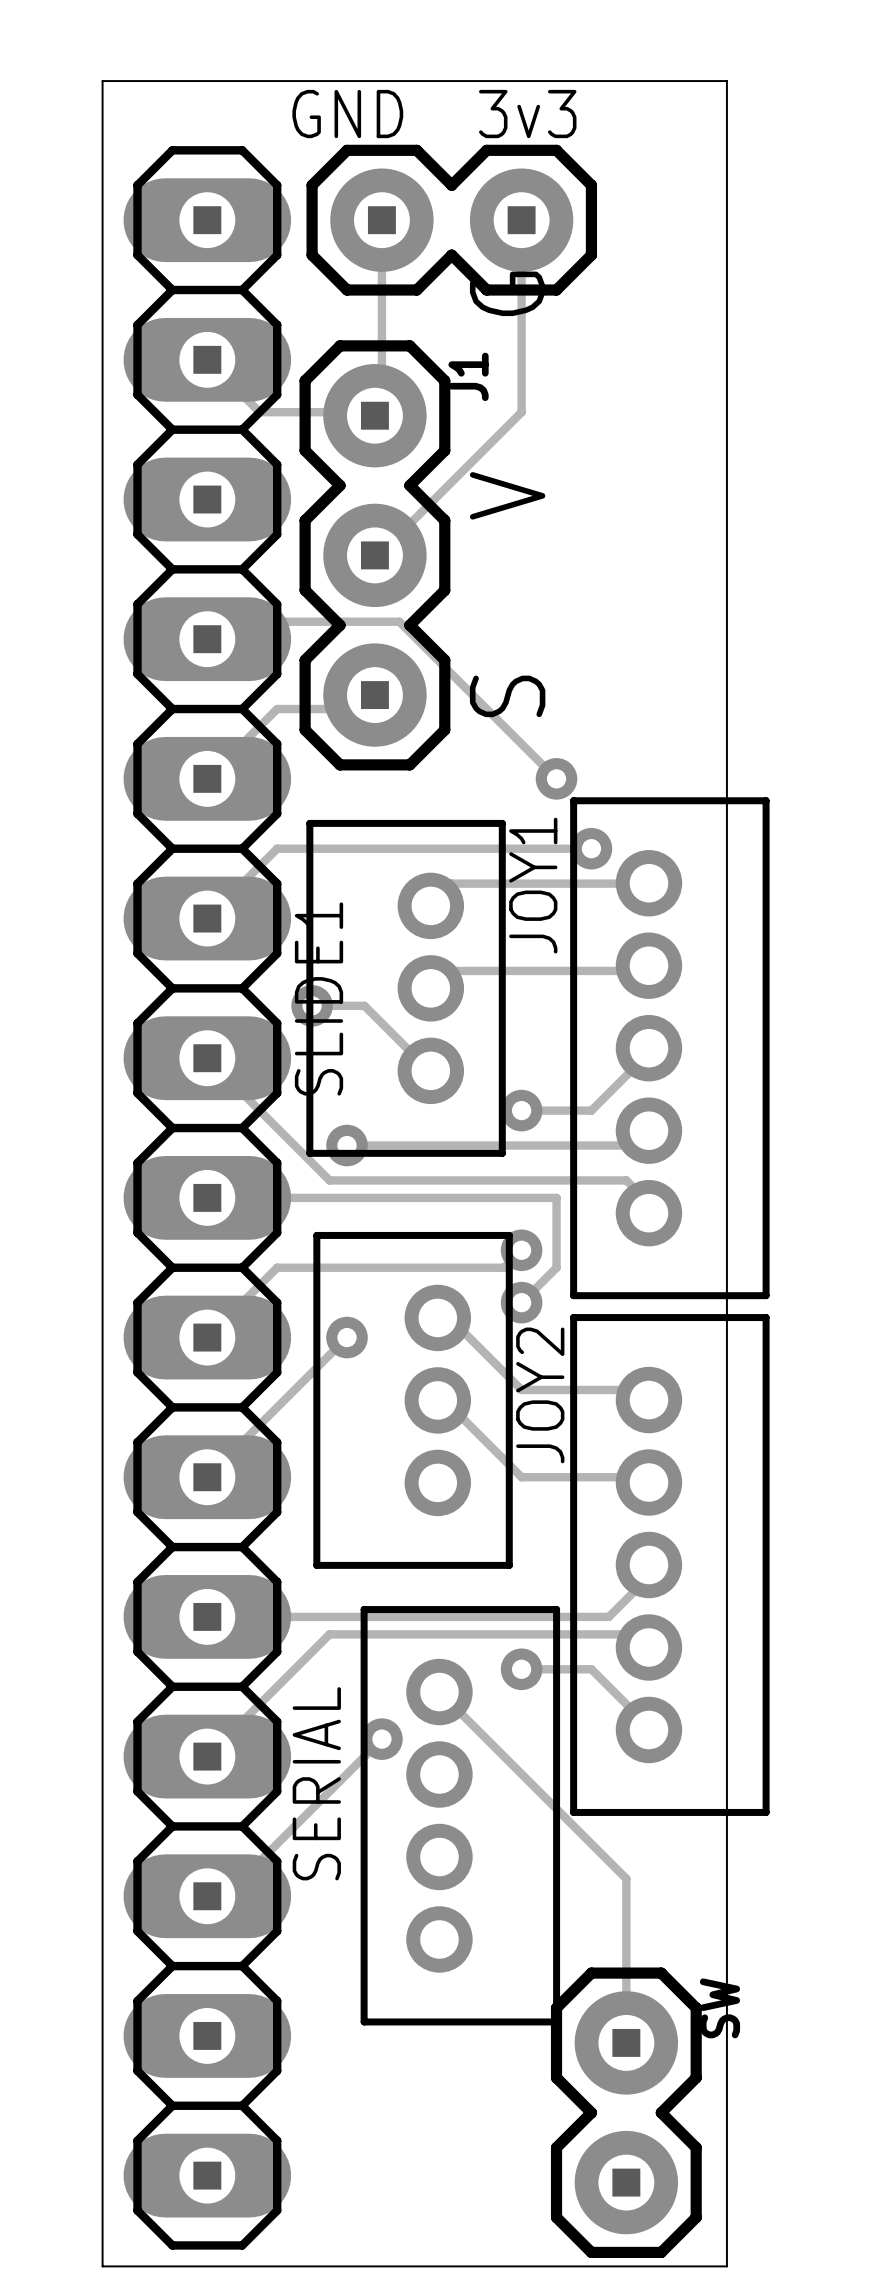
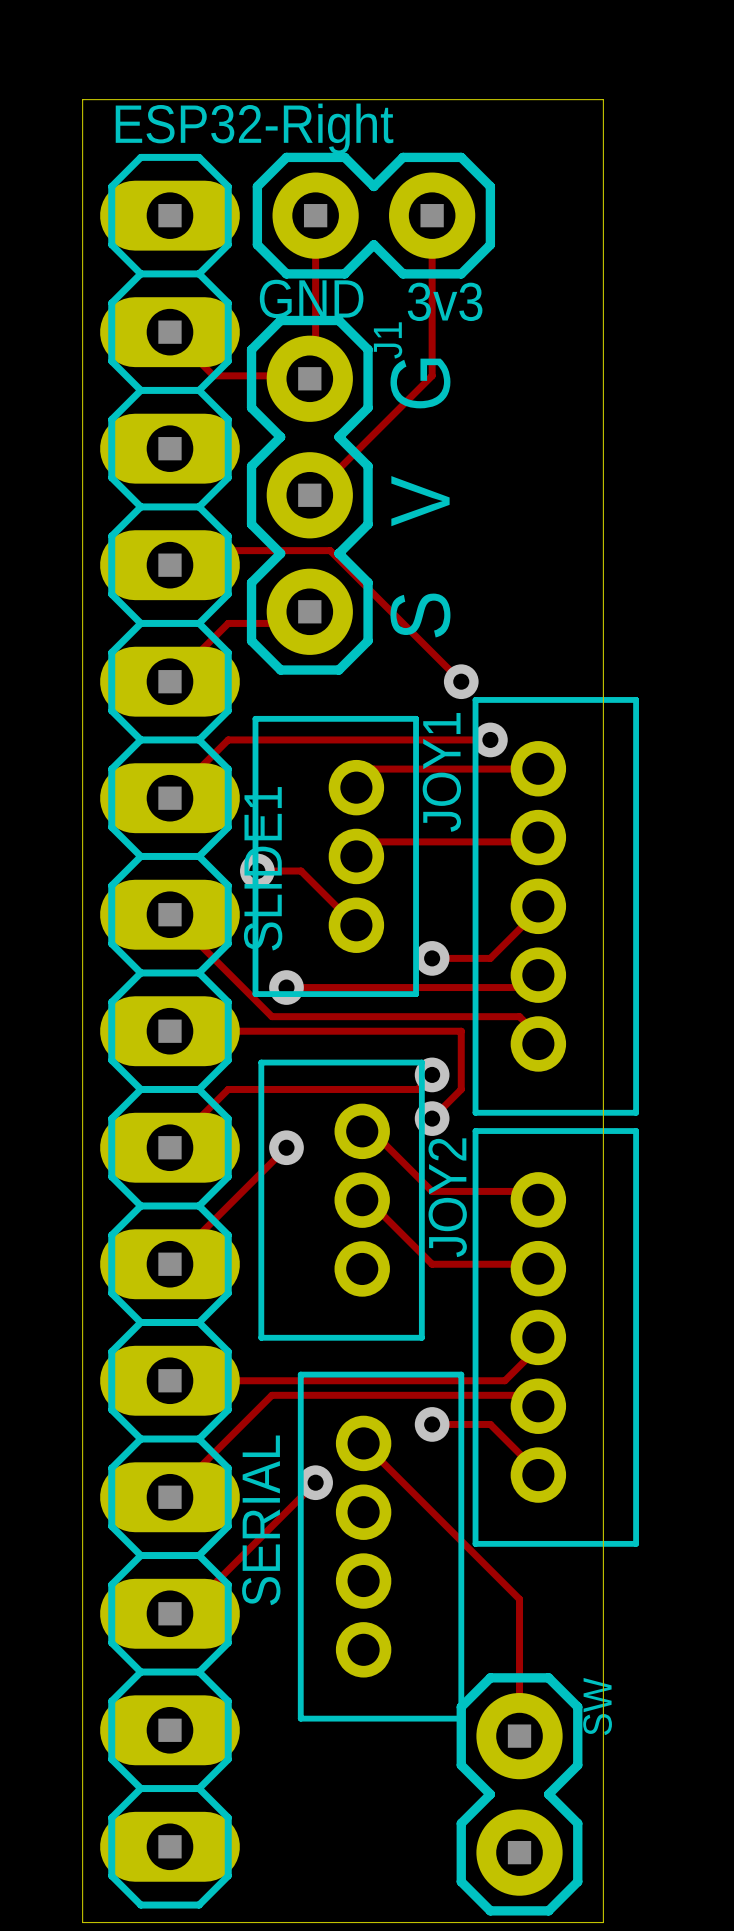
text position: GND (347, 114) -> GND (311, 298)
text position: 3v3 (527, 114) -> 3v3 (445, 301)
text: none -> ESP32-Right (254, 128)

